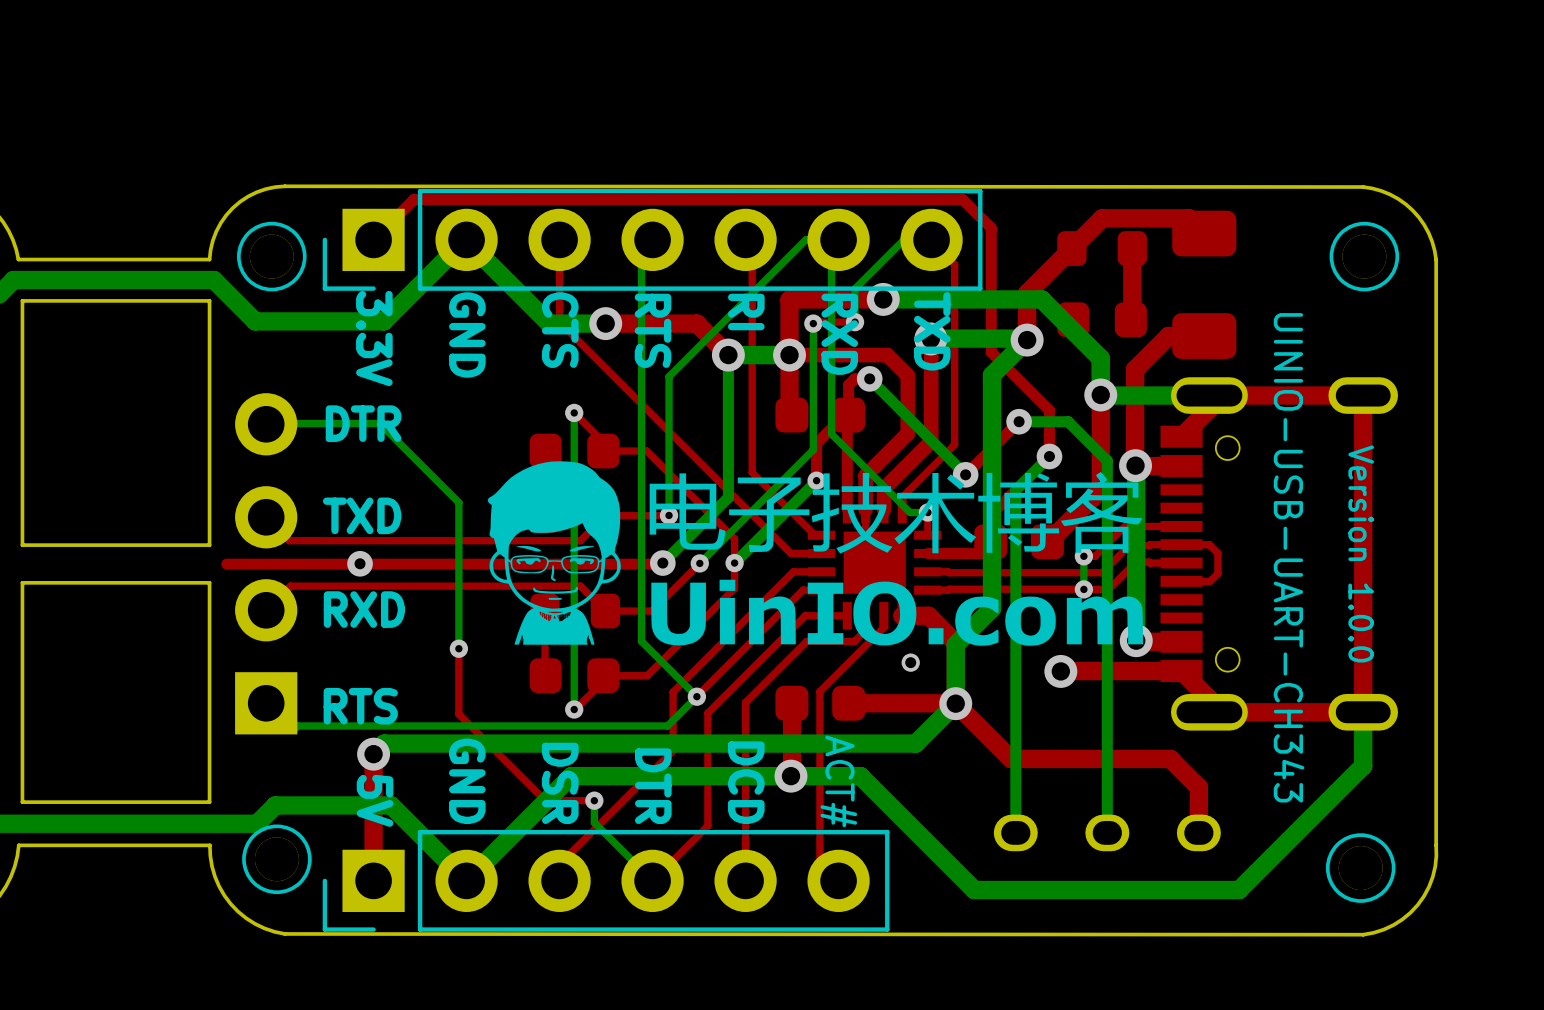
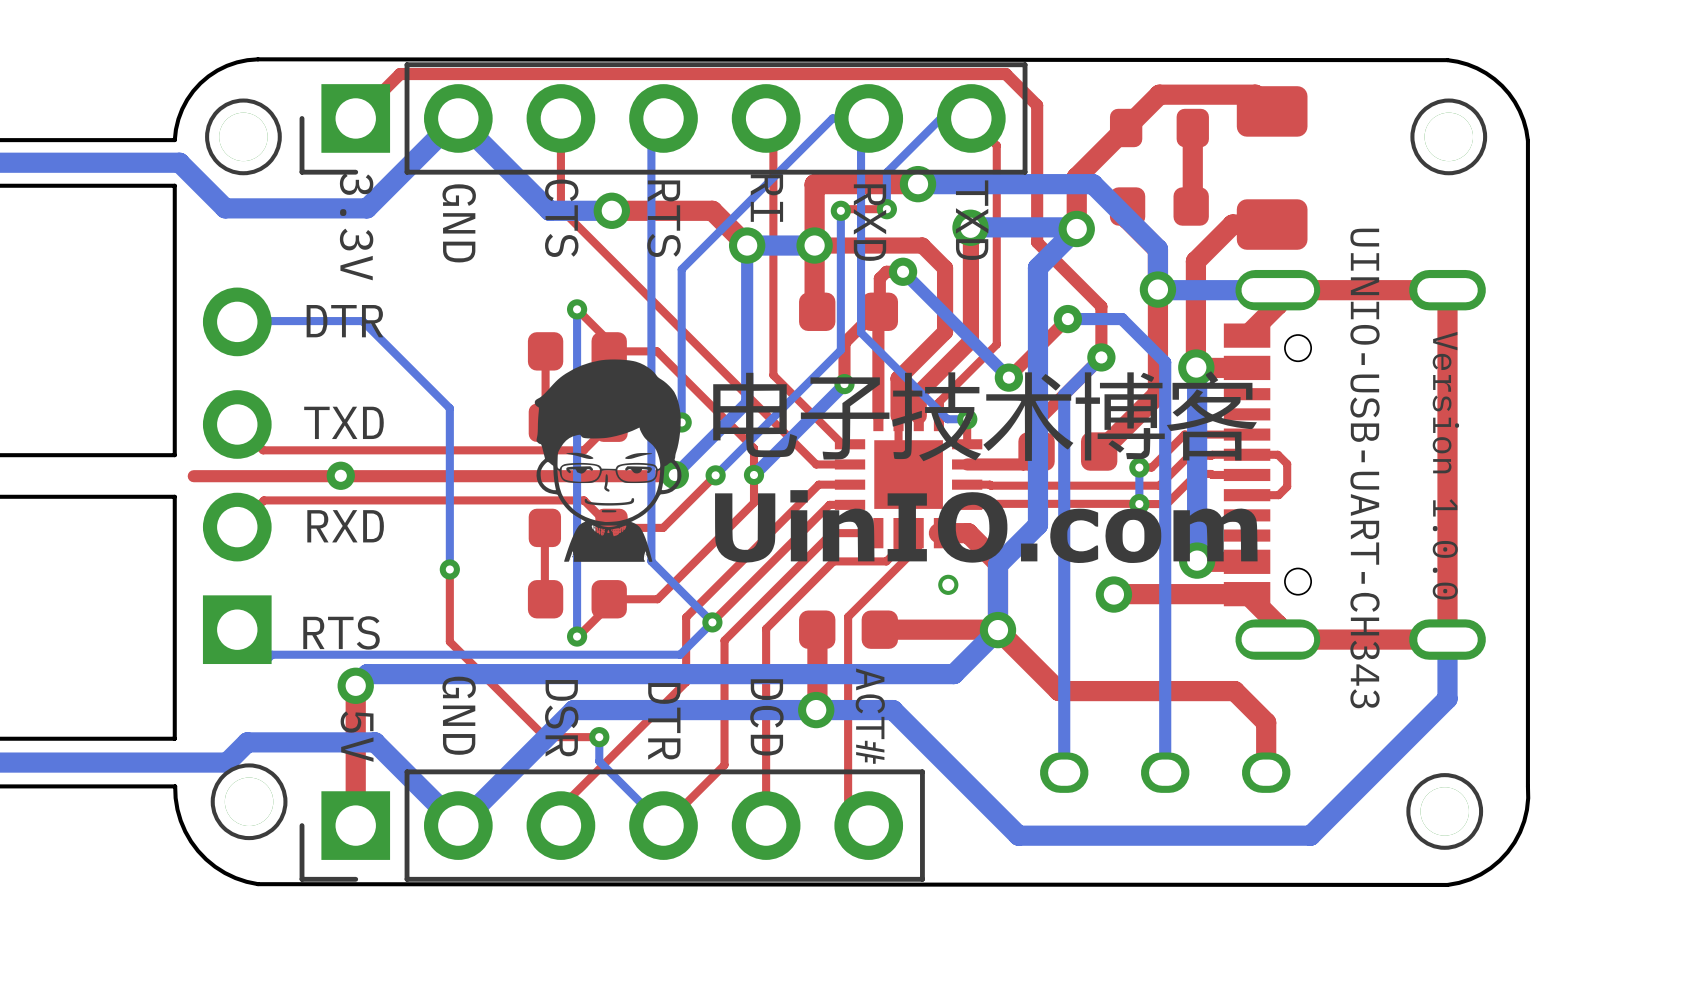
drawing position: (815, 553) -> (896, 461)

